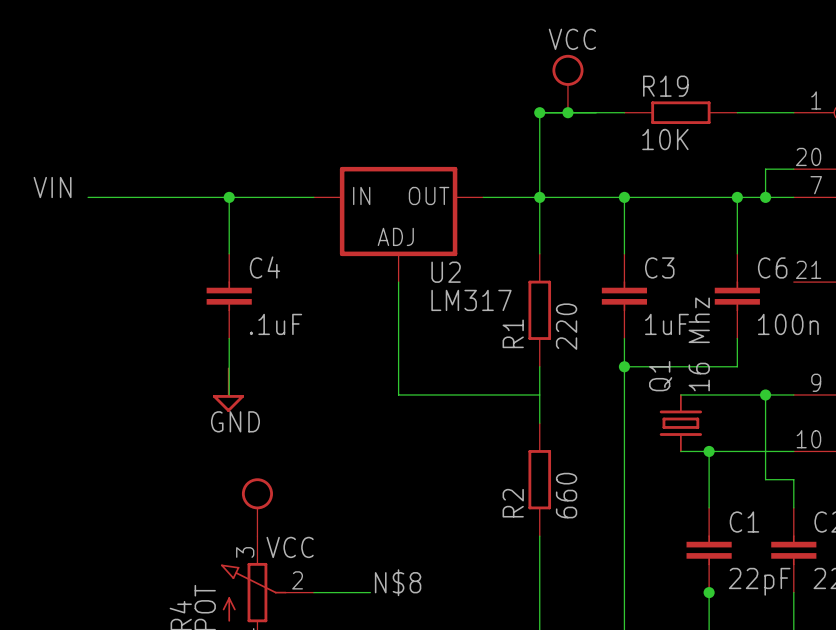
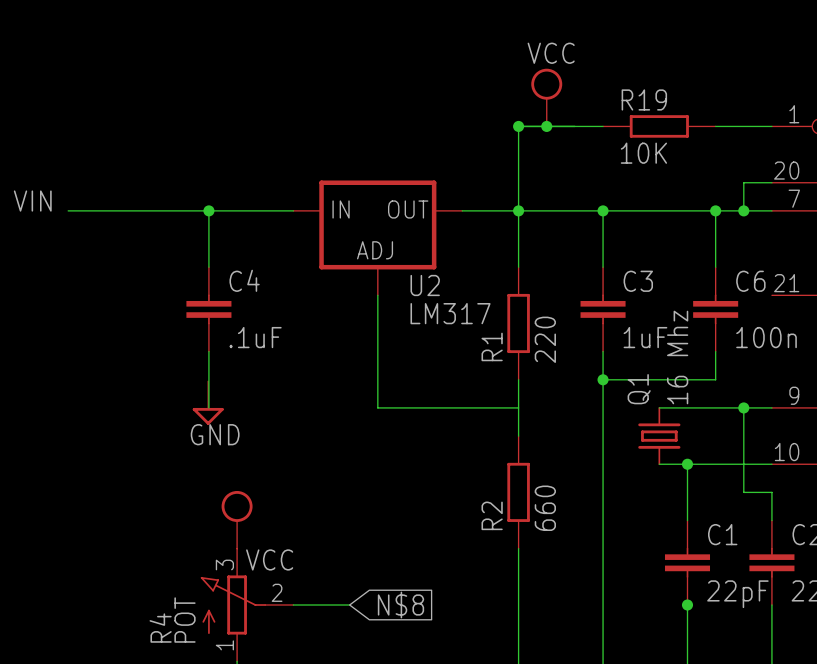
label: N$8 (398, 582) -> none
global label: none -> N$8 (400, 605)

